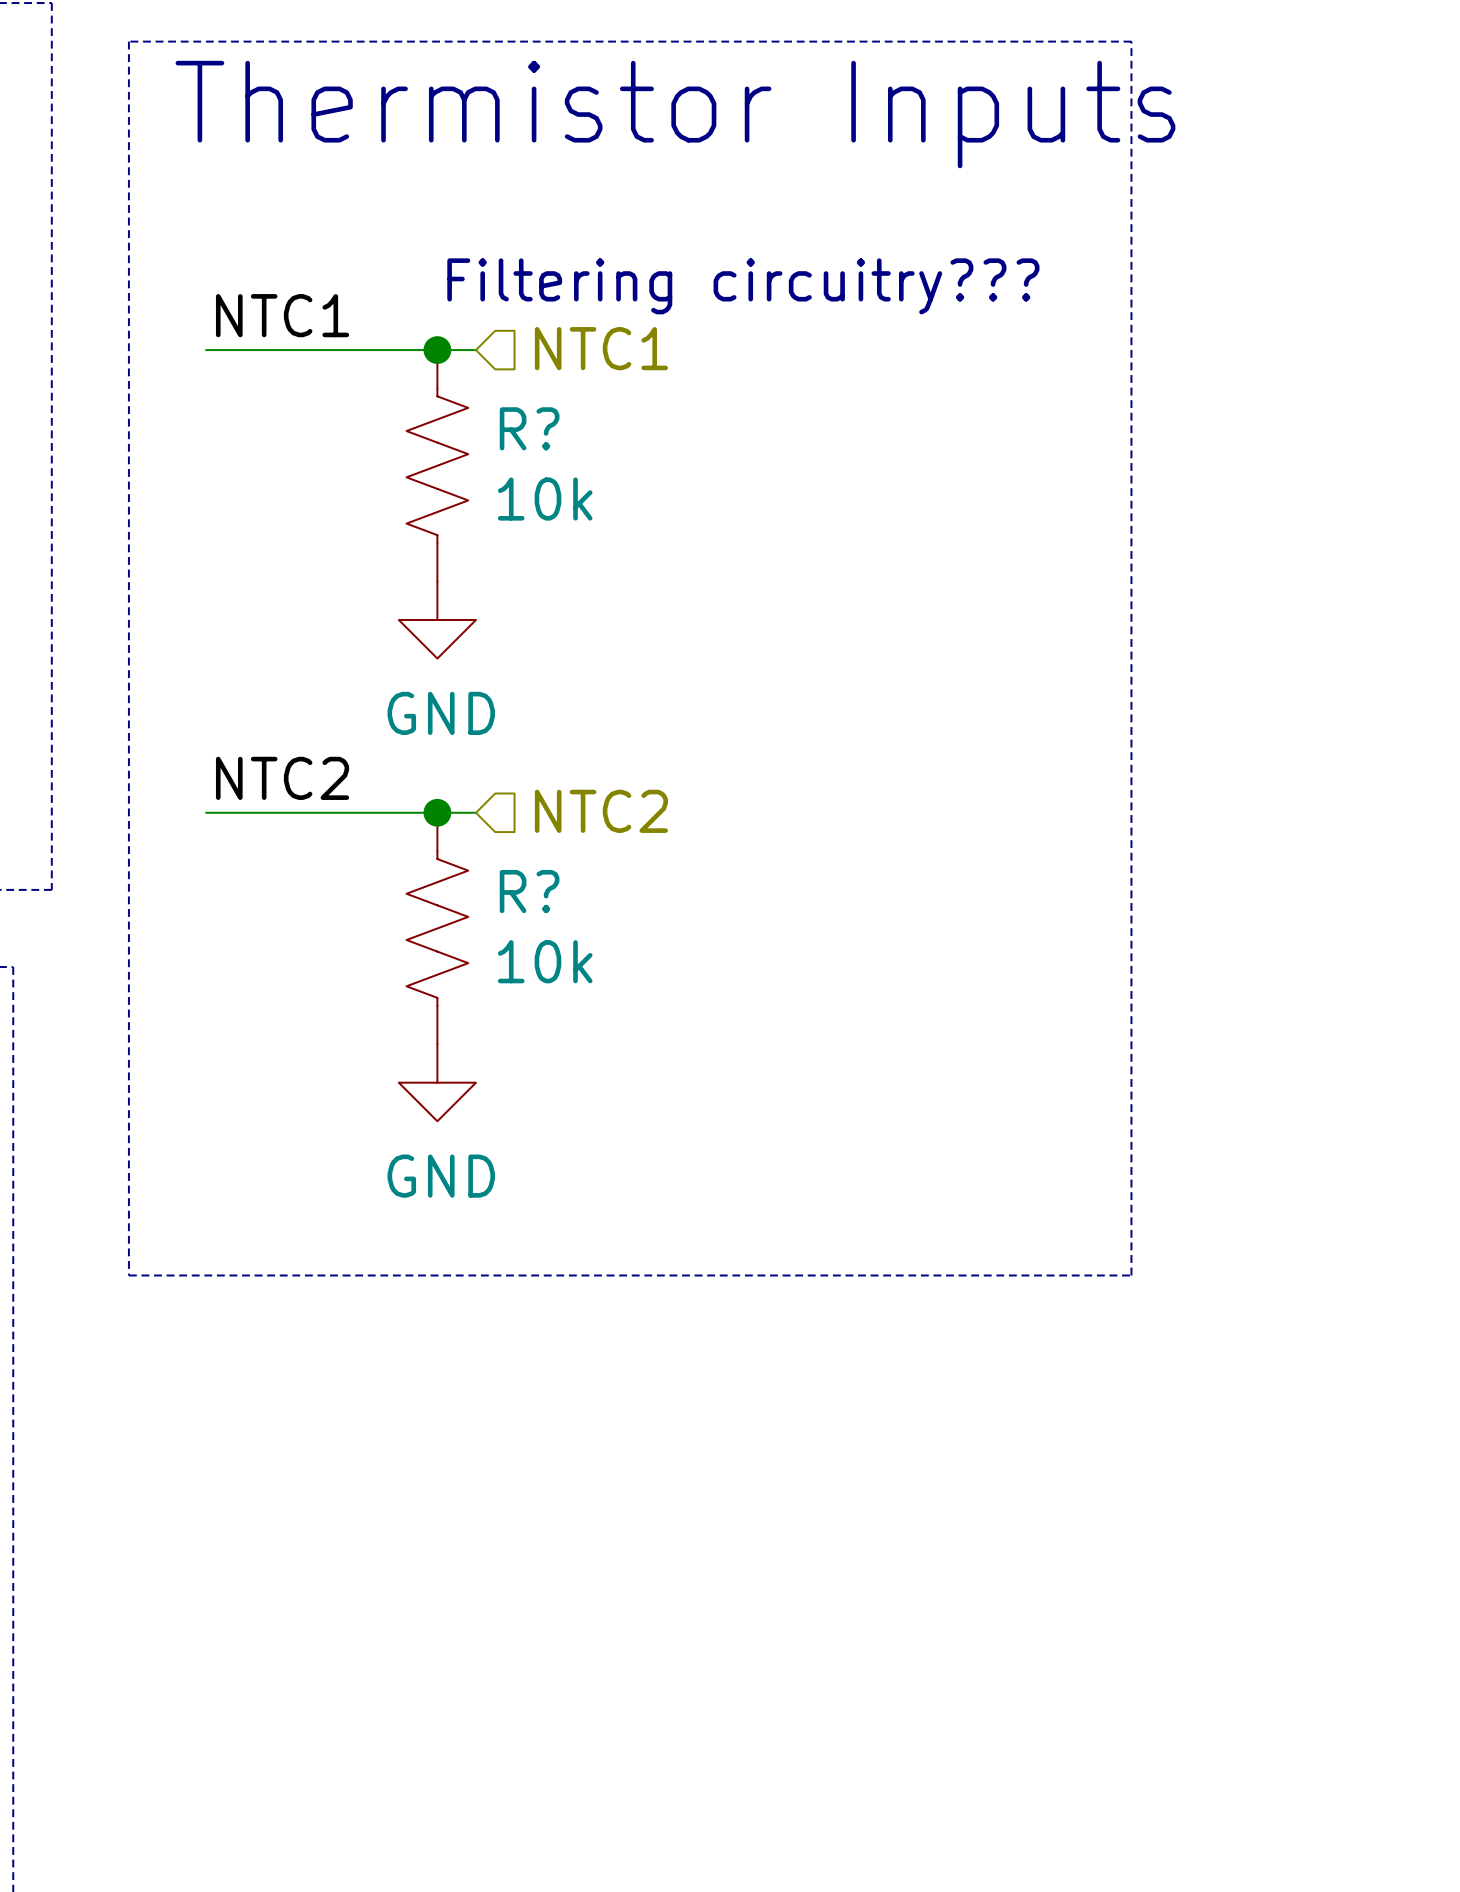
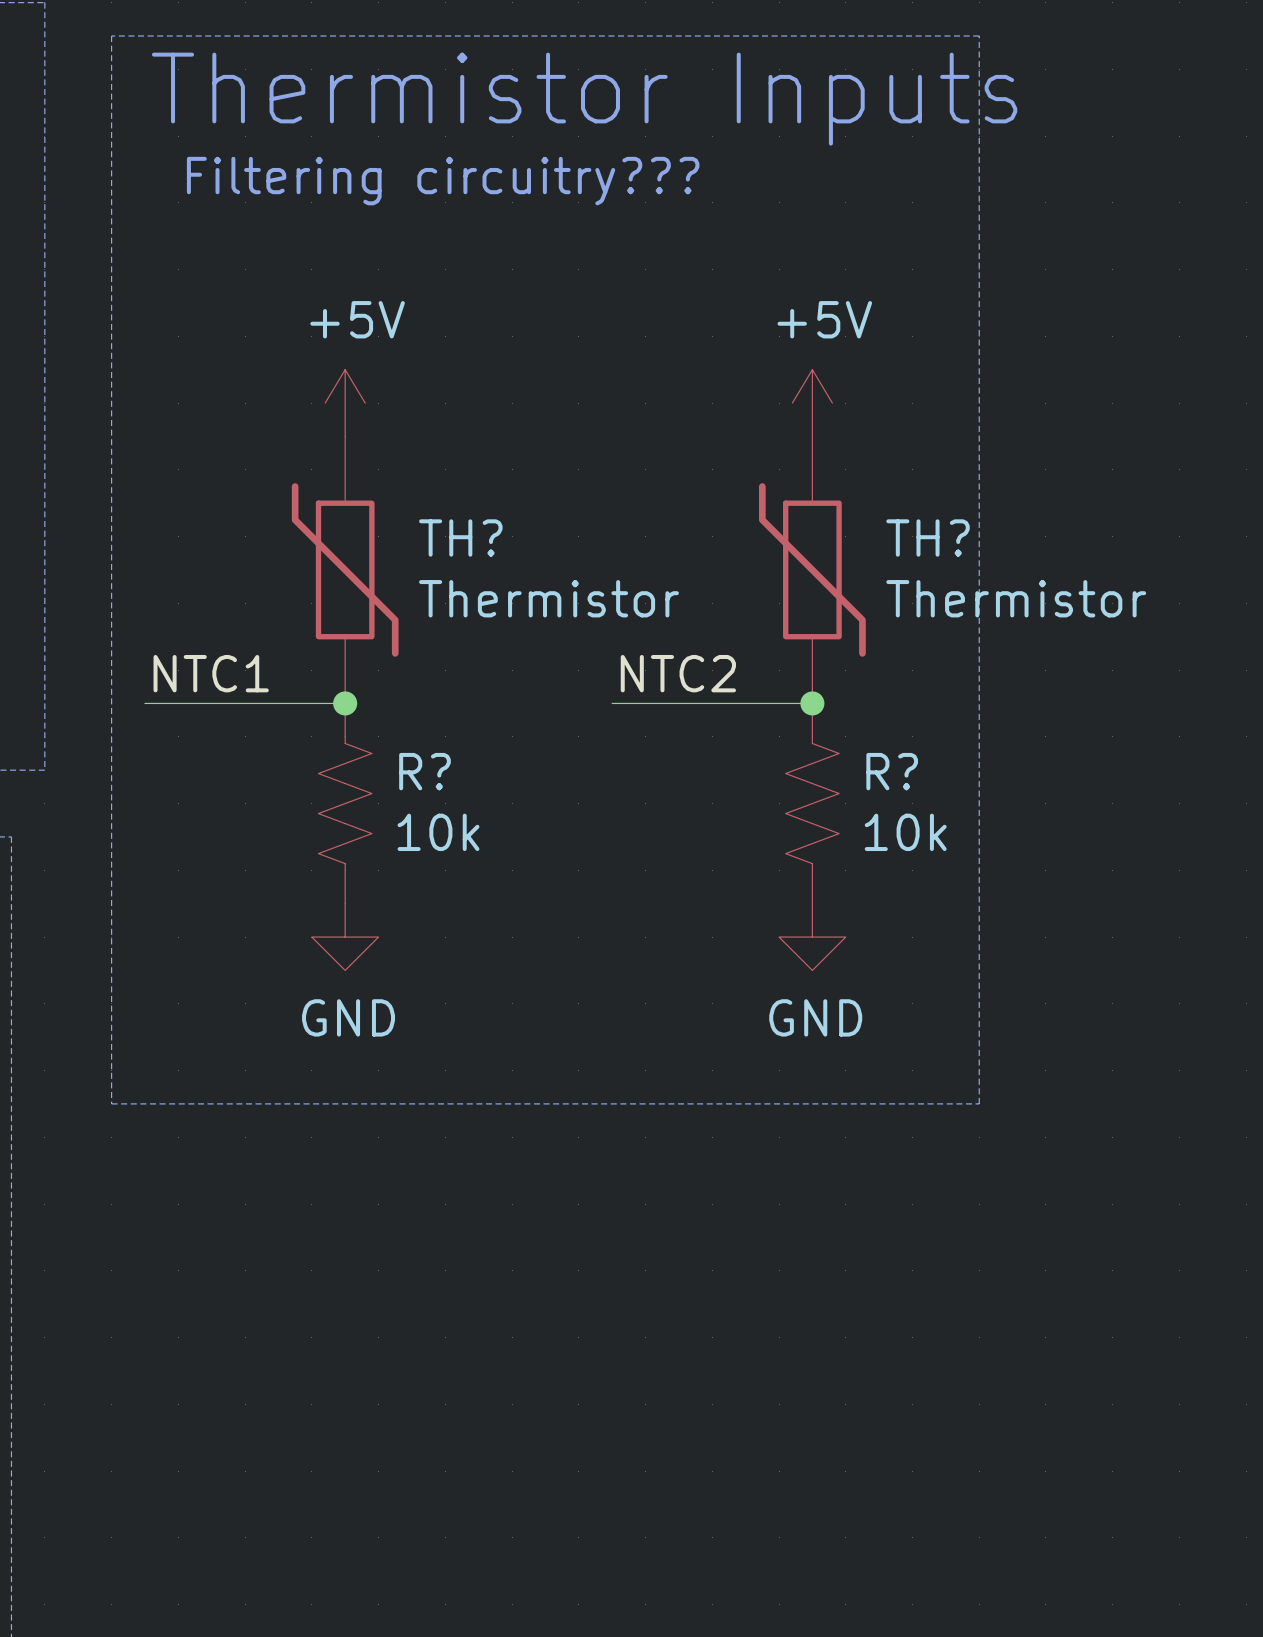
text position: Filtering circuitry??? (743, 286) -> Filtering circuitry??? (443, 181)
label position: NTC1 (282, 315) -> NTC1 (211, 673)
hierarchical label: NTC1 (601, 348) -> none
wire: (206, 350) (475, 350) -> none
junction: (437, 350) -> none
power symbol: none -> +5V (345, 403)
R?: 10k (437, 465) -> none
power symbol: none -> +5V (812, 403)
power symbol: GND (437, 619) -> none
TH?: none -> Thermistor (345, 569)
TH?: none -> Thermistor (812, 569)
label position: NTC2 (282, 778) -> NTC2 (678, 673)
hierarchical label: NTC2 (601, 811) -> none
wire: none -> (144, 703) (178, 703)
wire: (398, 812) (475, 812) -> none
junction position: (437, 812) -> (345, 703)
wire: none -> (612, 703) (812, 703)
junction: none -> (812, 703)
R? position: (437, 928) -> (345, 803)
R?: none -> 10k (812, 803)
power symbol position: GND (437, 1082) -> GND (345, 937)
power symbol: none -> GND (812, 937)

